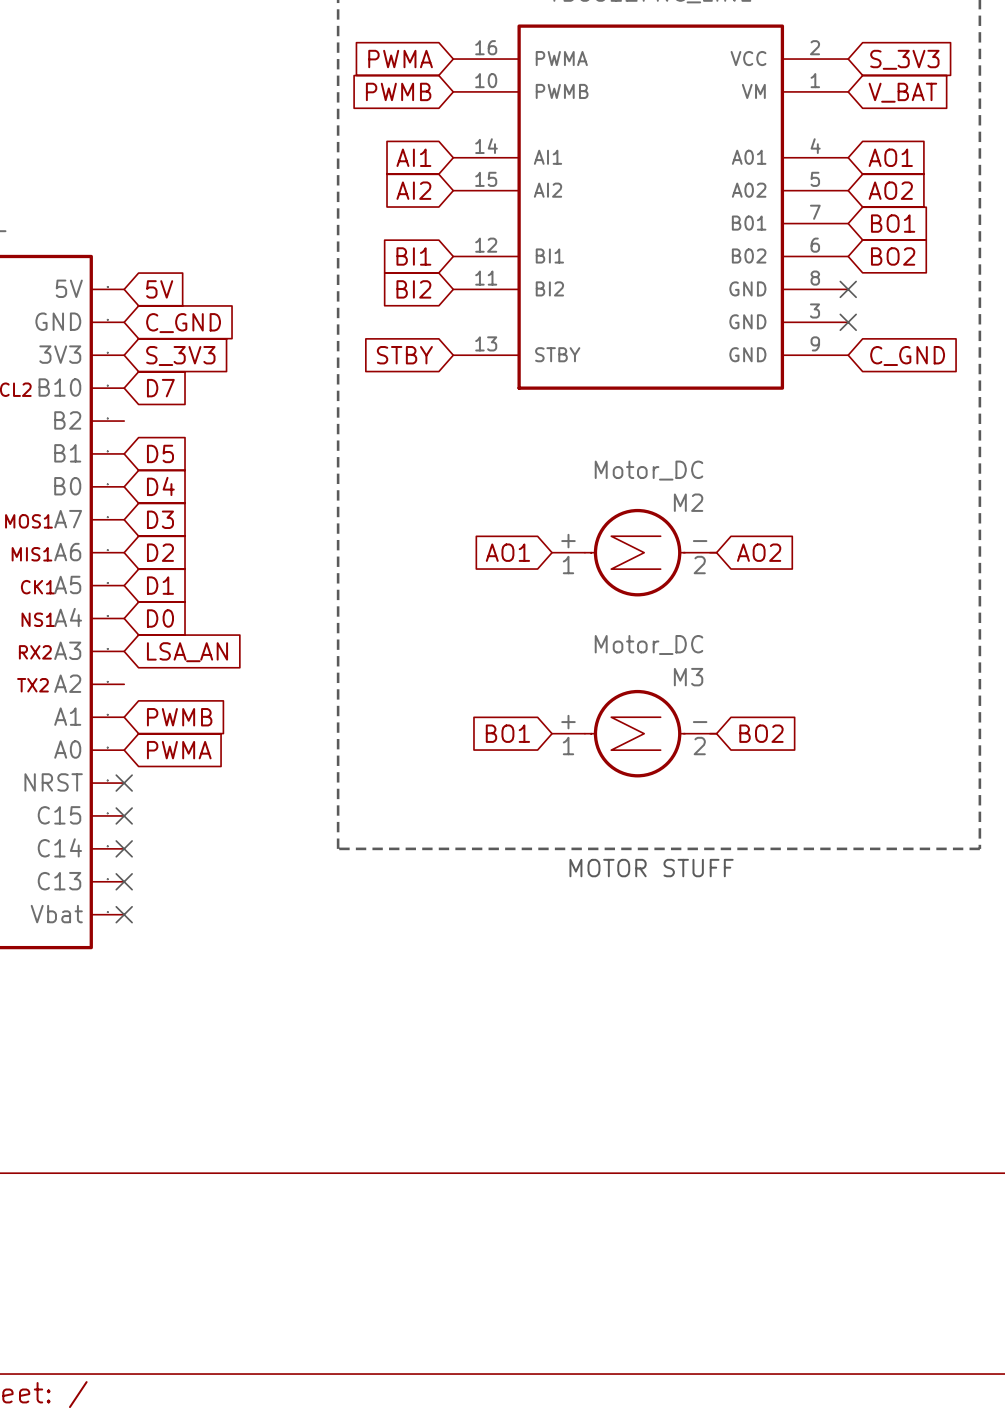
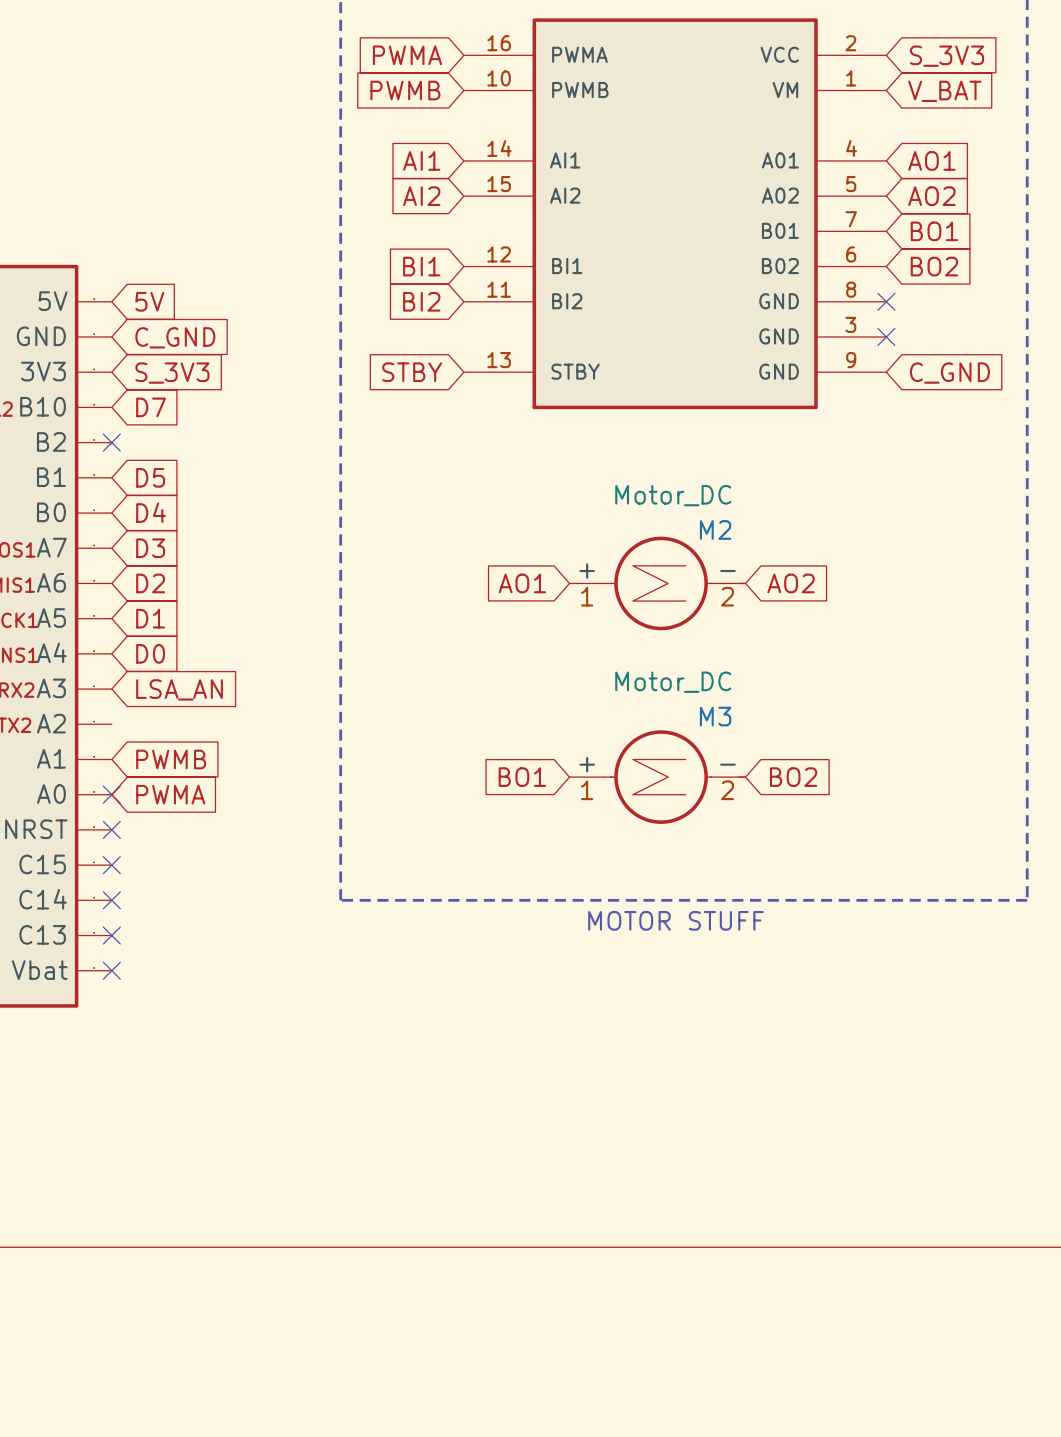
no-connect mark: none -> (111, 442)
no-connect mark: none -> (111, 794)

